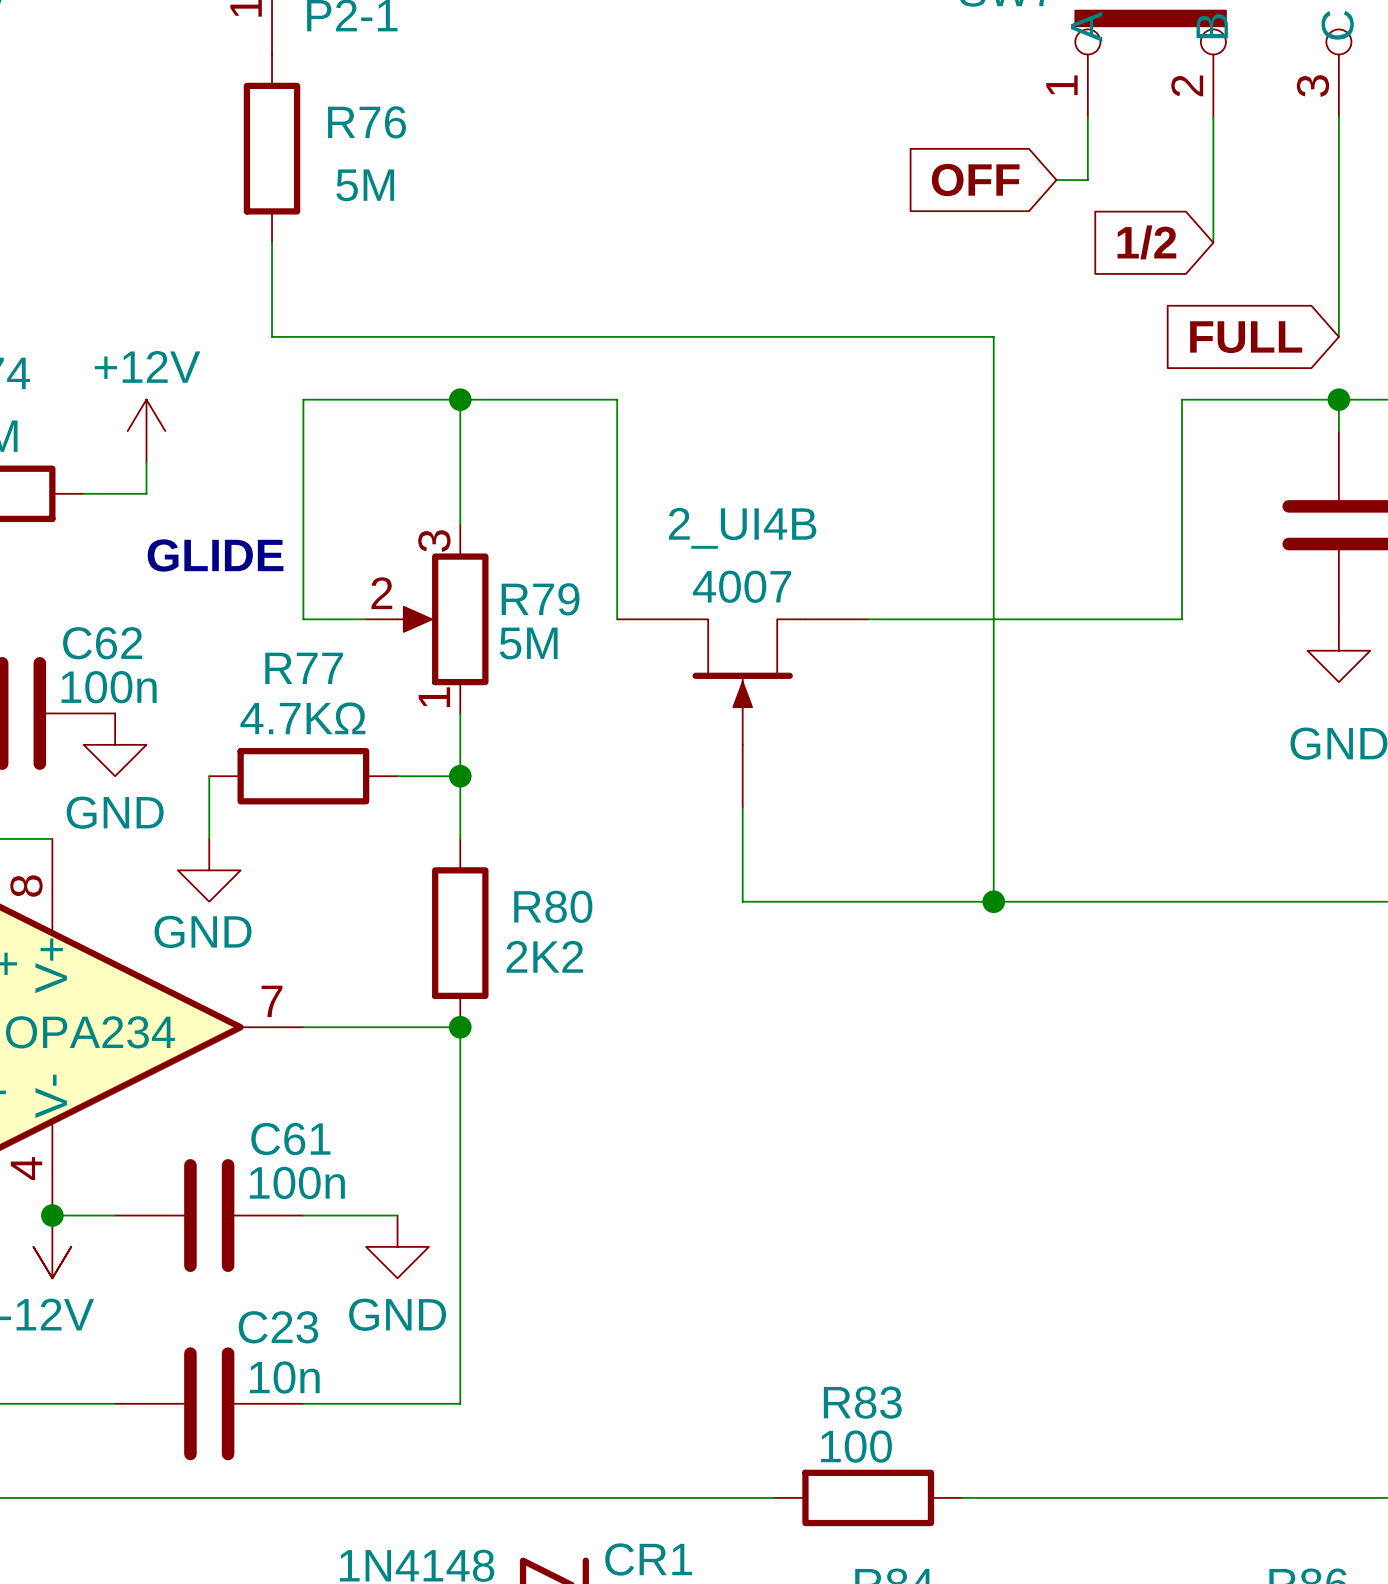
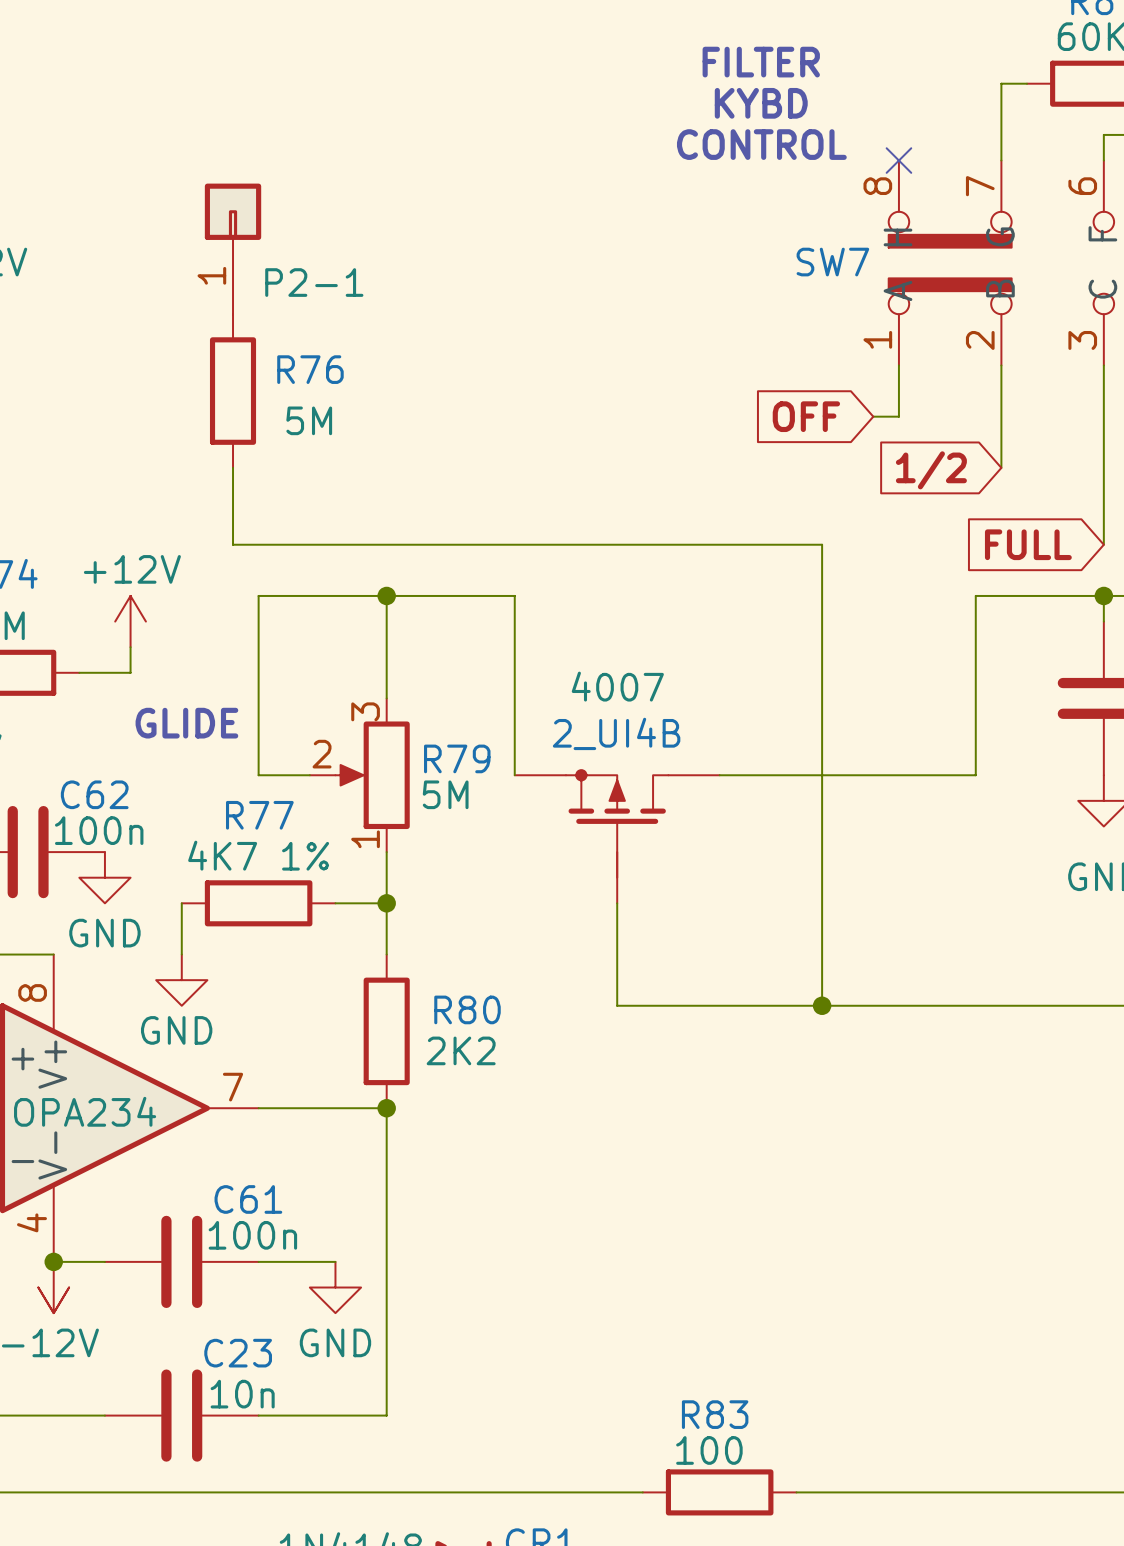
2_UI4B name position: 2_UI4B (742, 528) -> 2_UI4B (616, 733)
2_UI4B value position: 4007 (742, 586) -> 4007 (617, 686)
2_UI4B symbol: [617, 619, 869, 808] -> [514, 770, 720, 904]
R77 value: 4.7KΩ (302, 718) -> 4K7 1% (258, 855)

